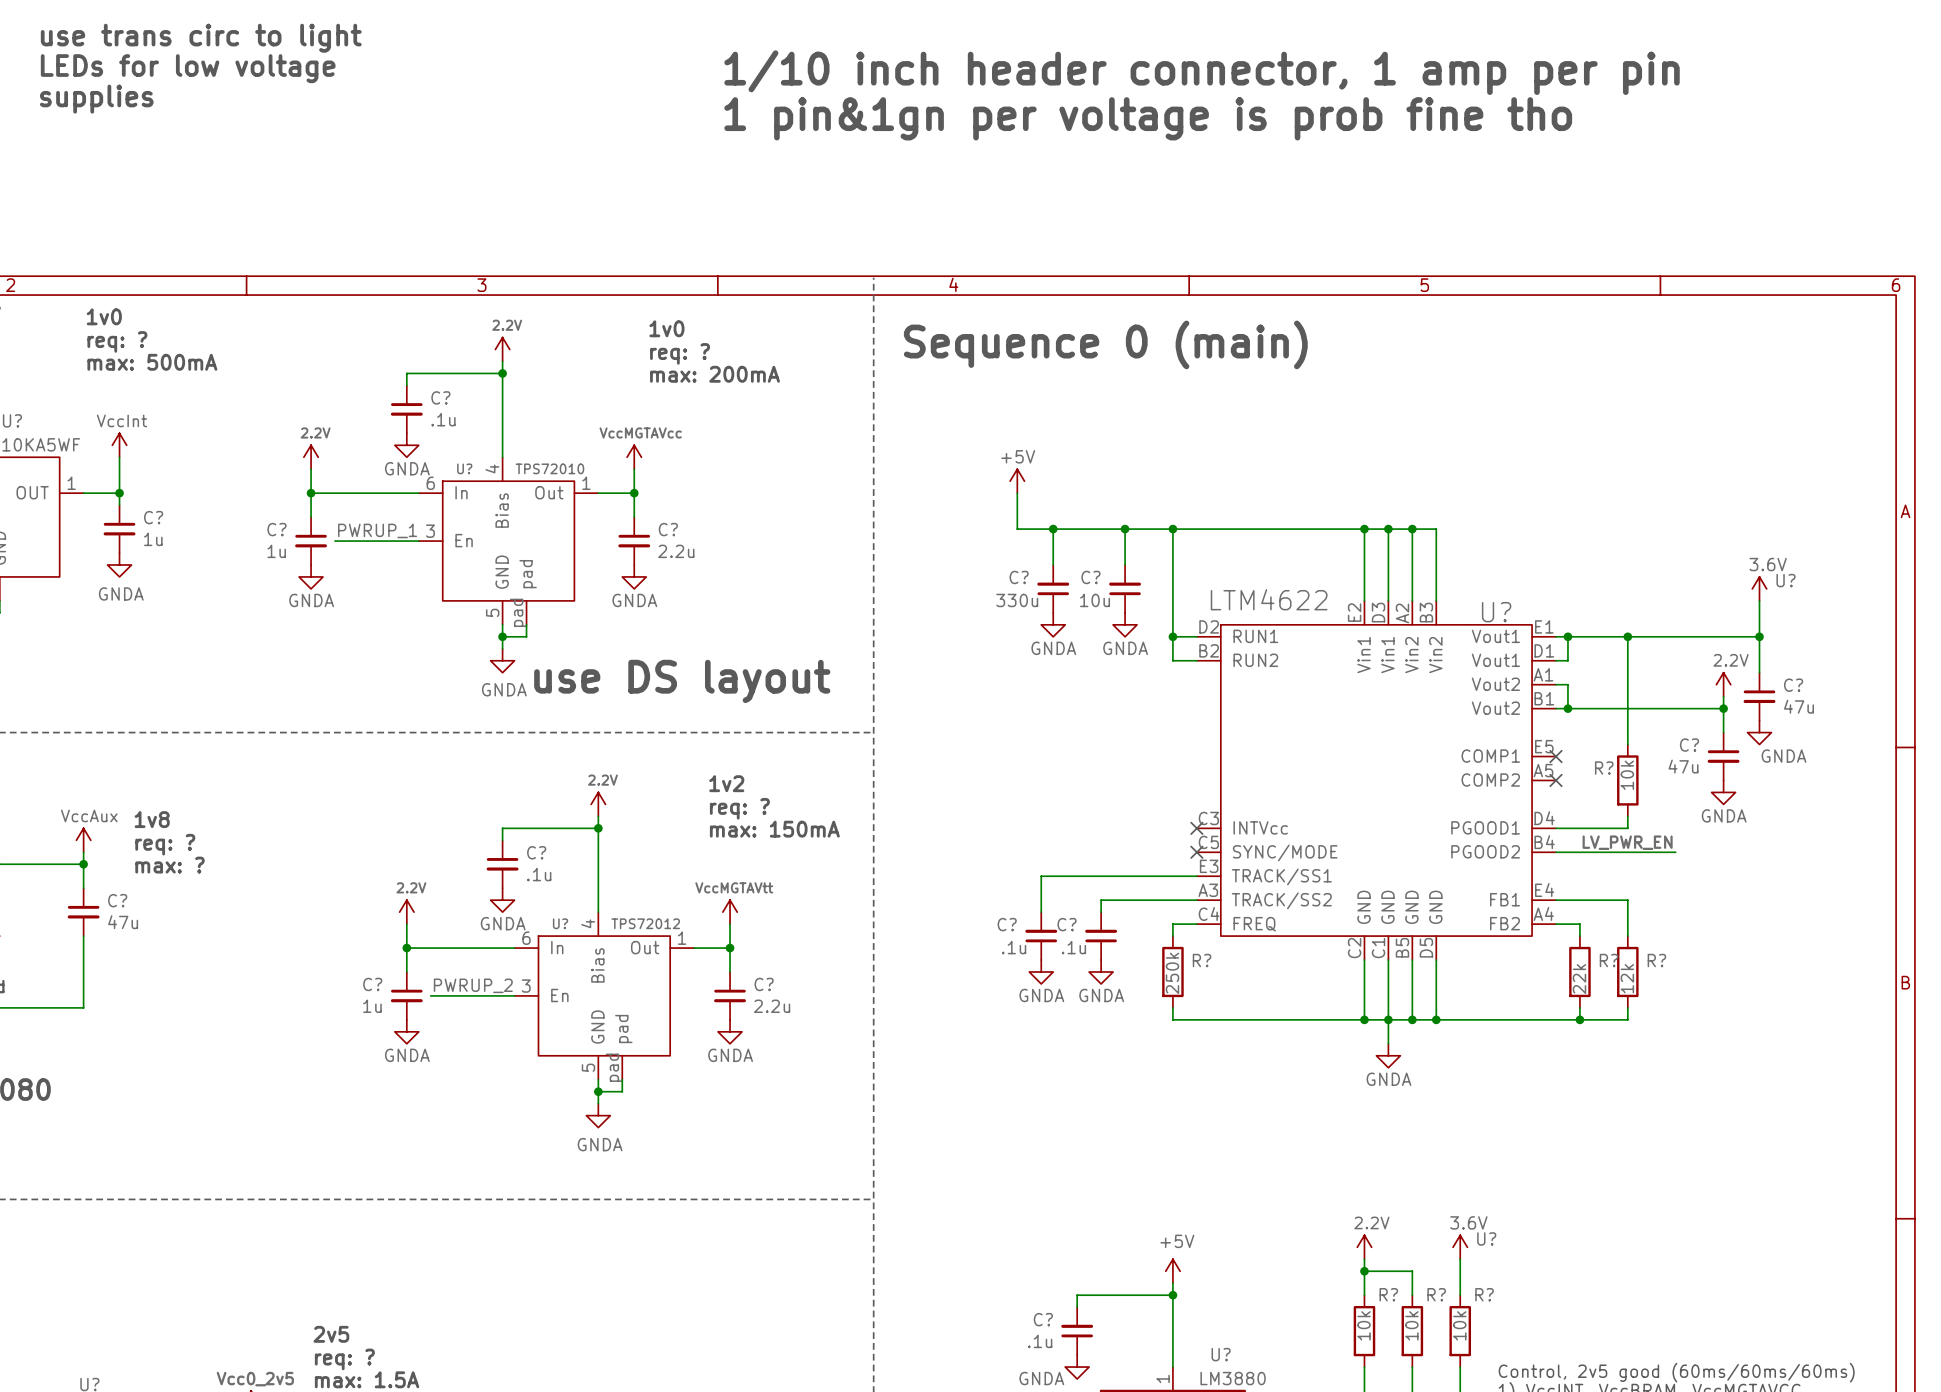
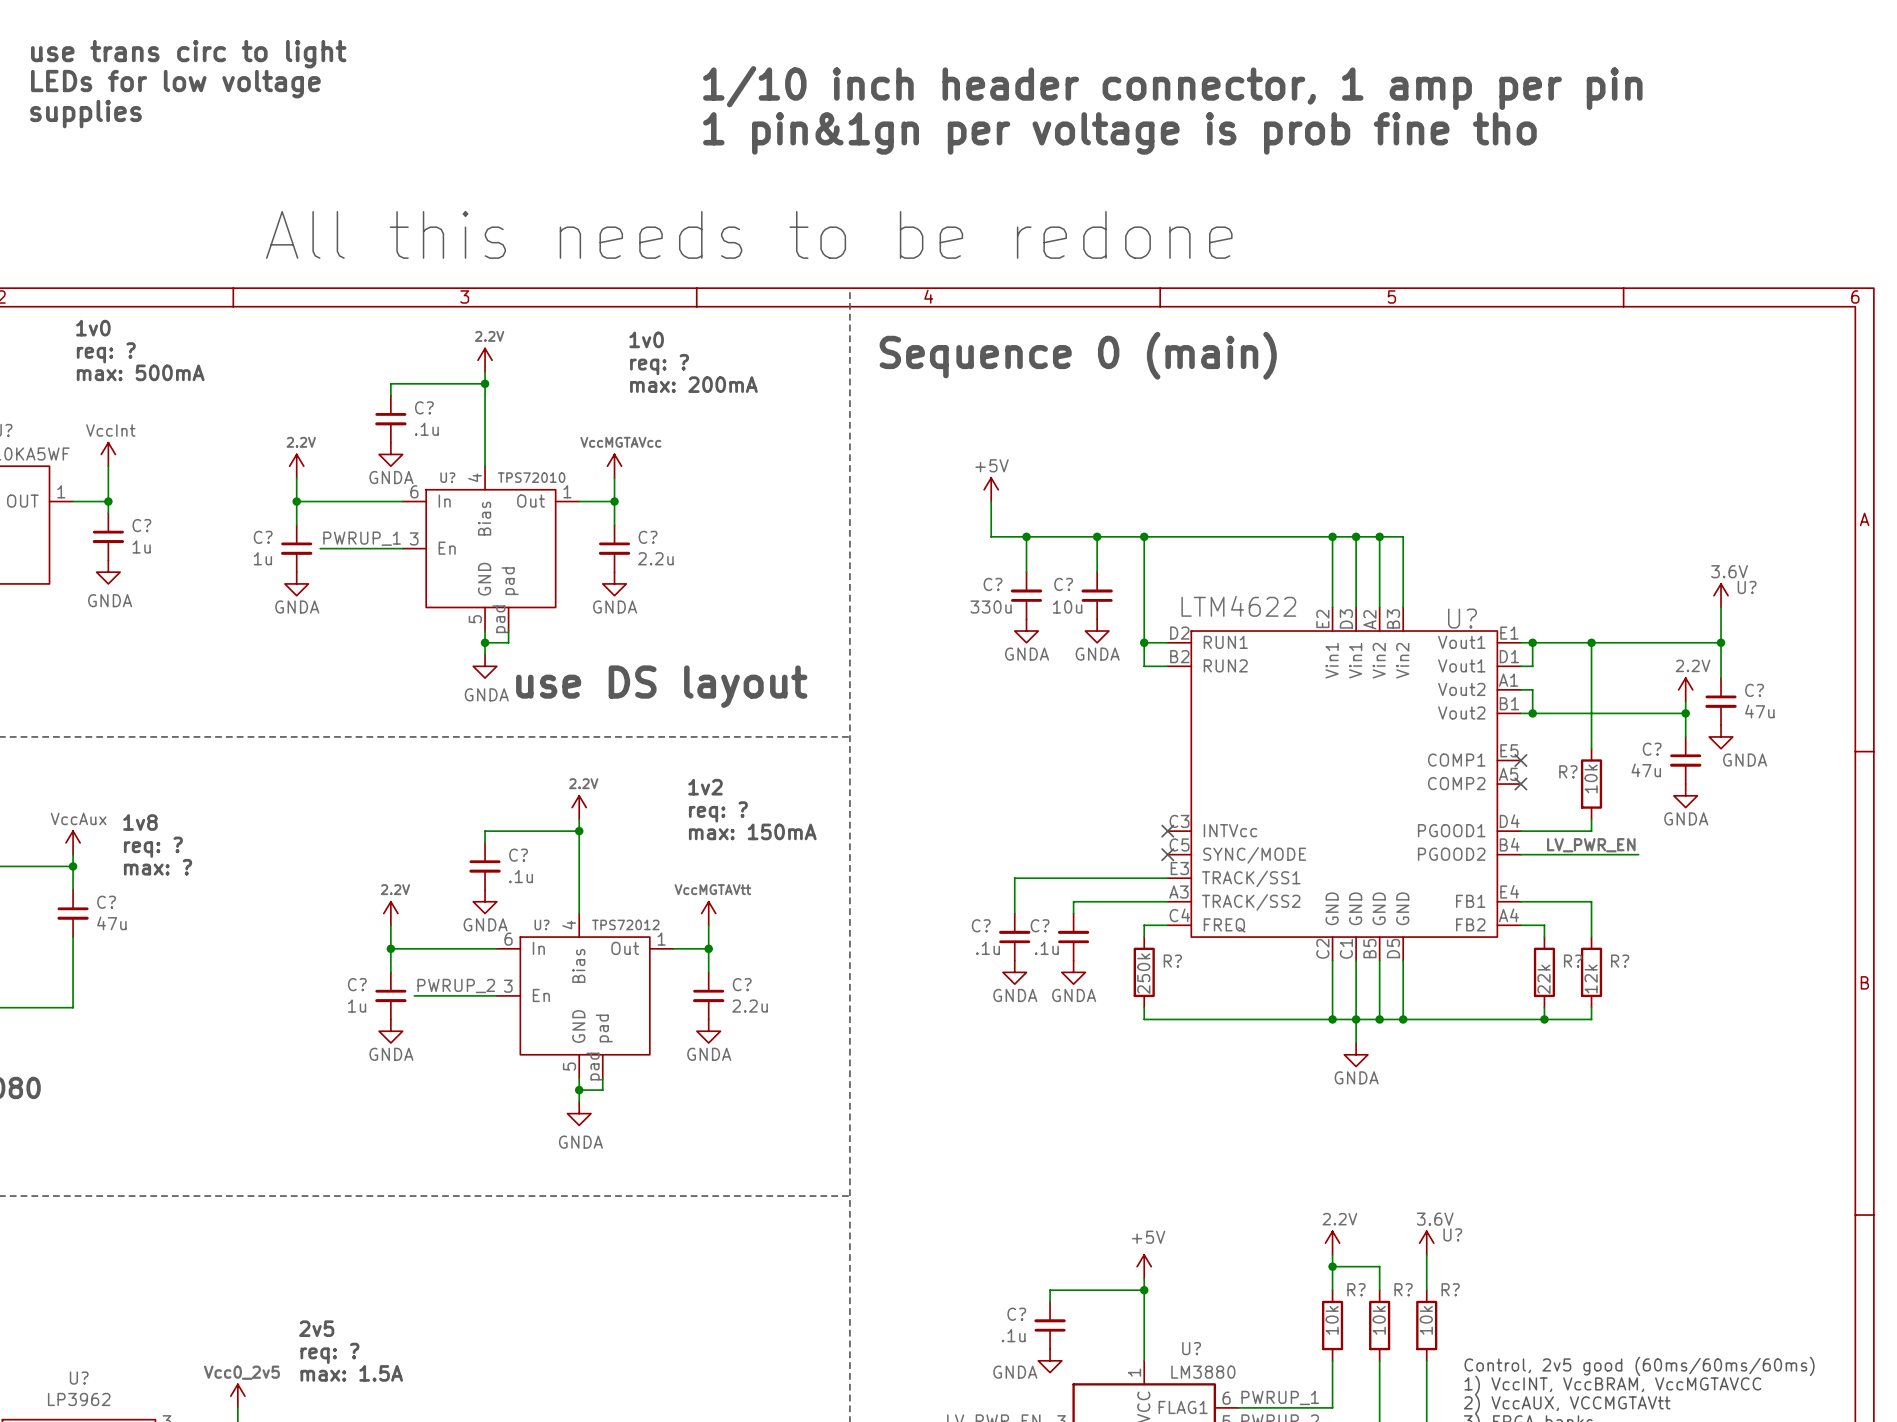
text: none -> All this needs to be redone (749, 234)

